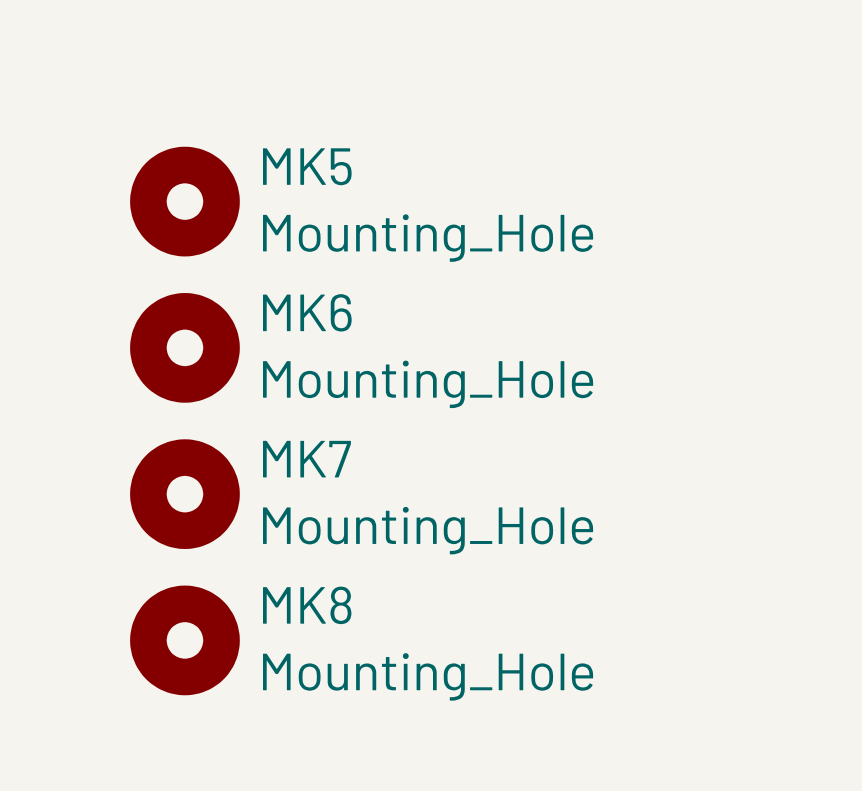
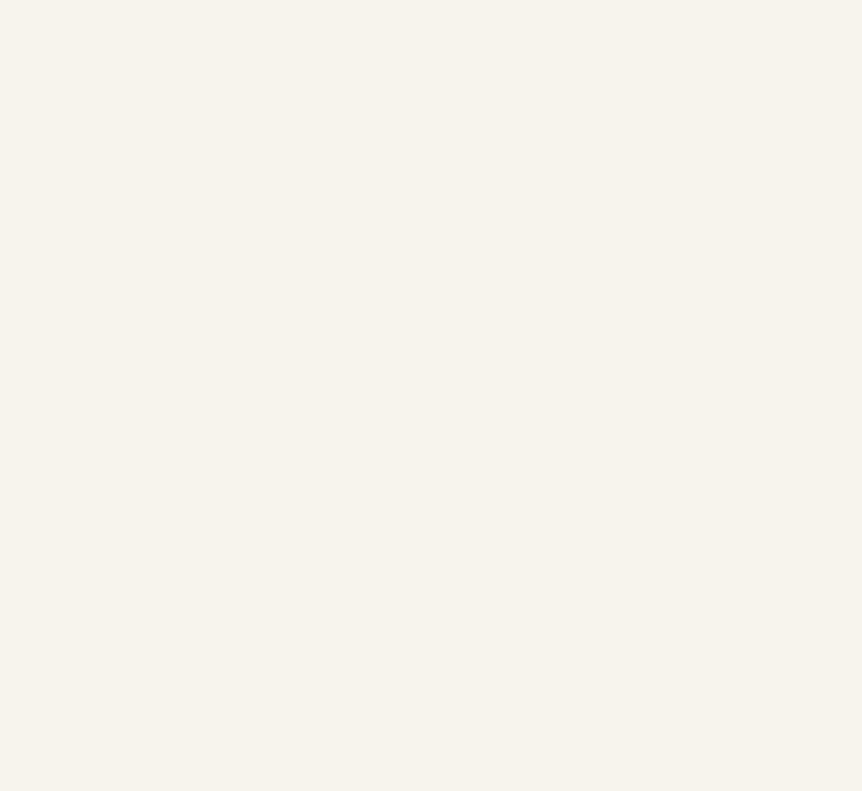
MK5: Mounting_Hole (184, 201) -> none
MK6: Mounting_Hole (184, 347) -> none
MK7: Mounting_Hole (184, 494) -> none
MK8: Mounting_Hole (184, 640) -> none

